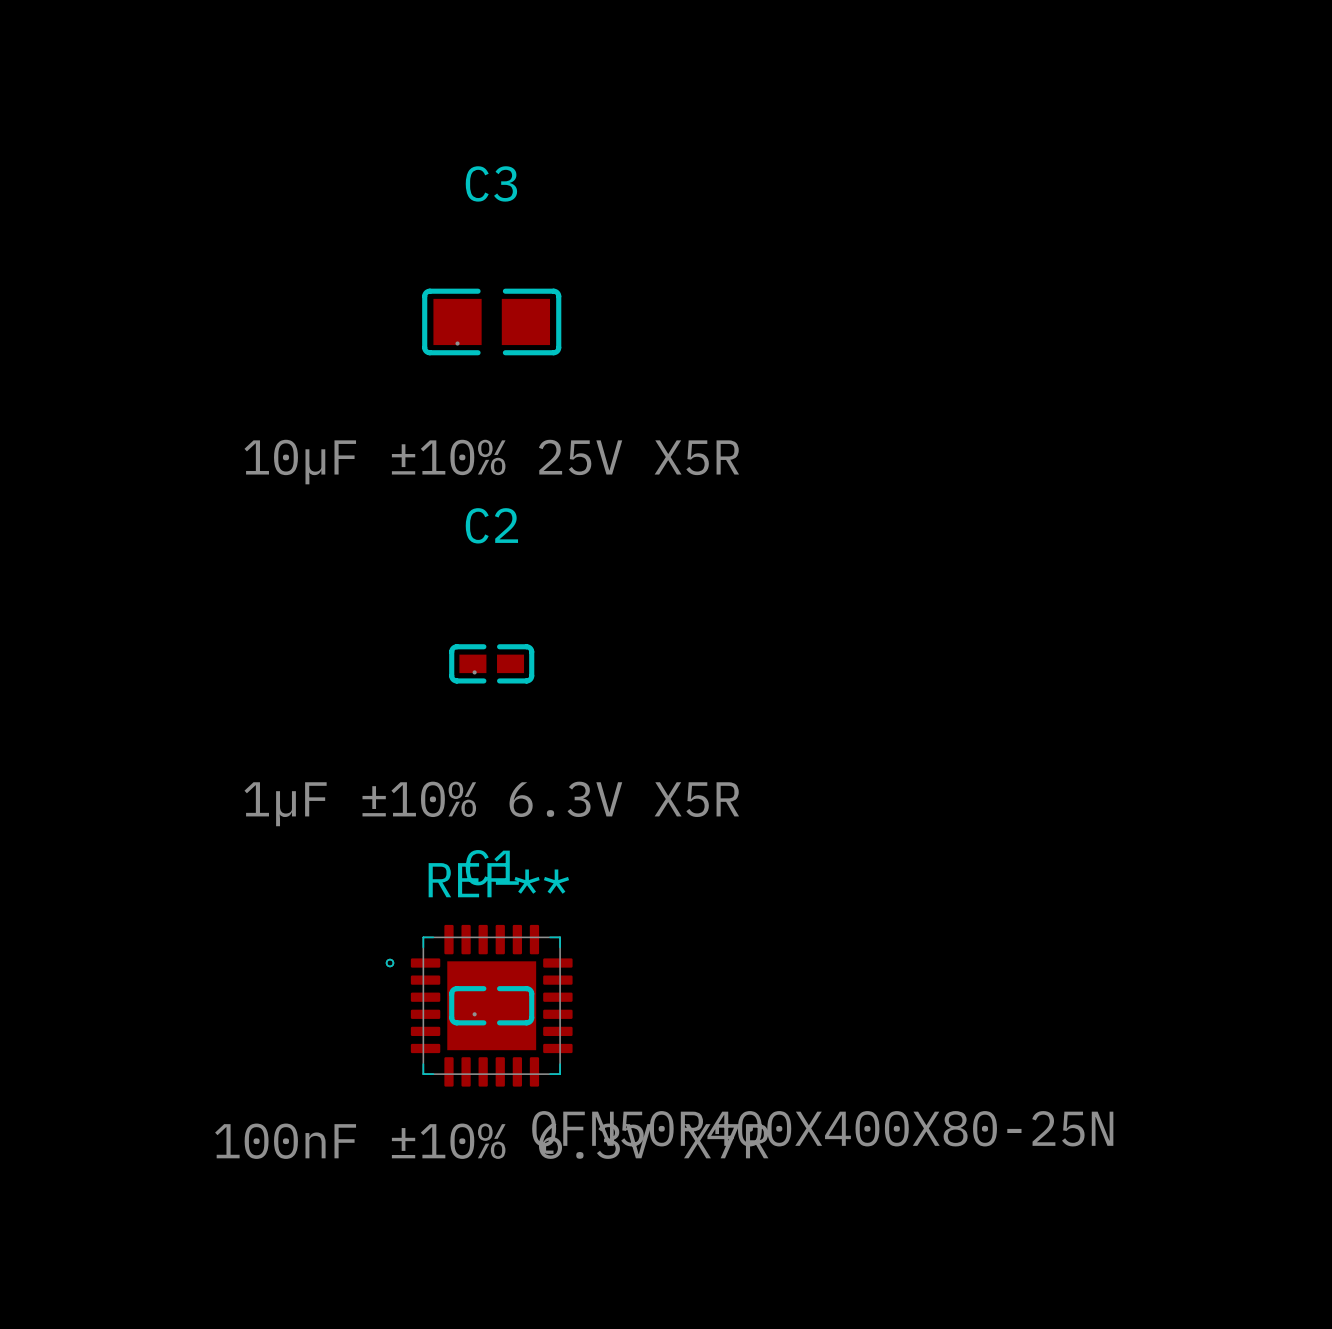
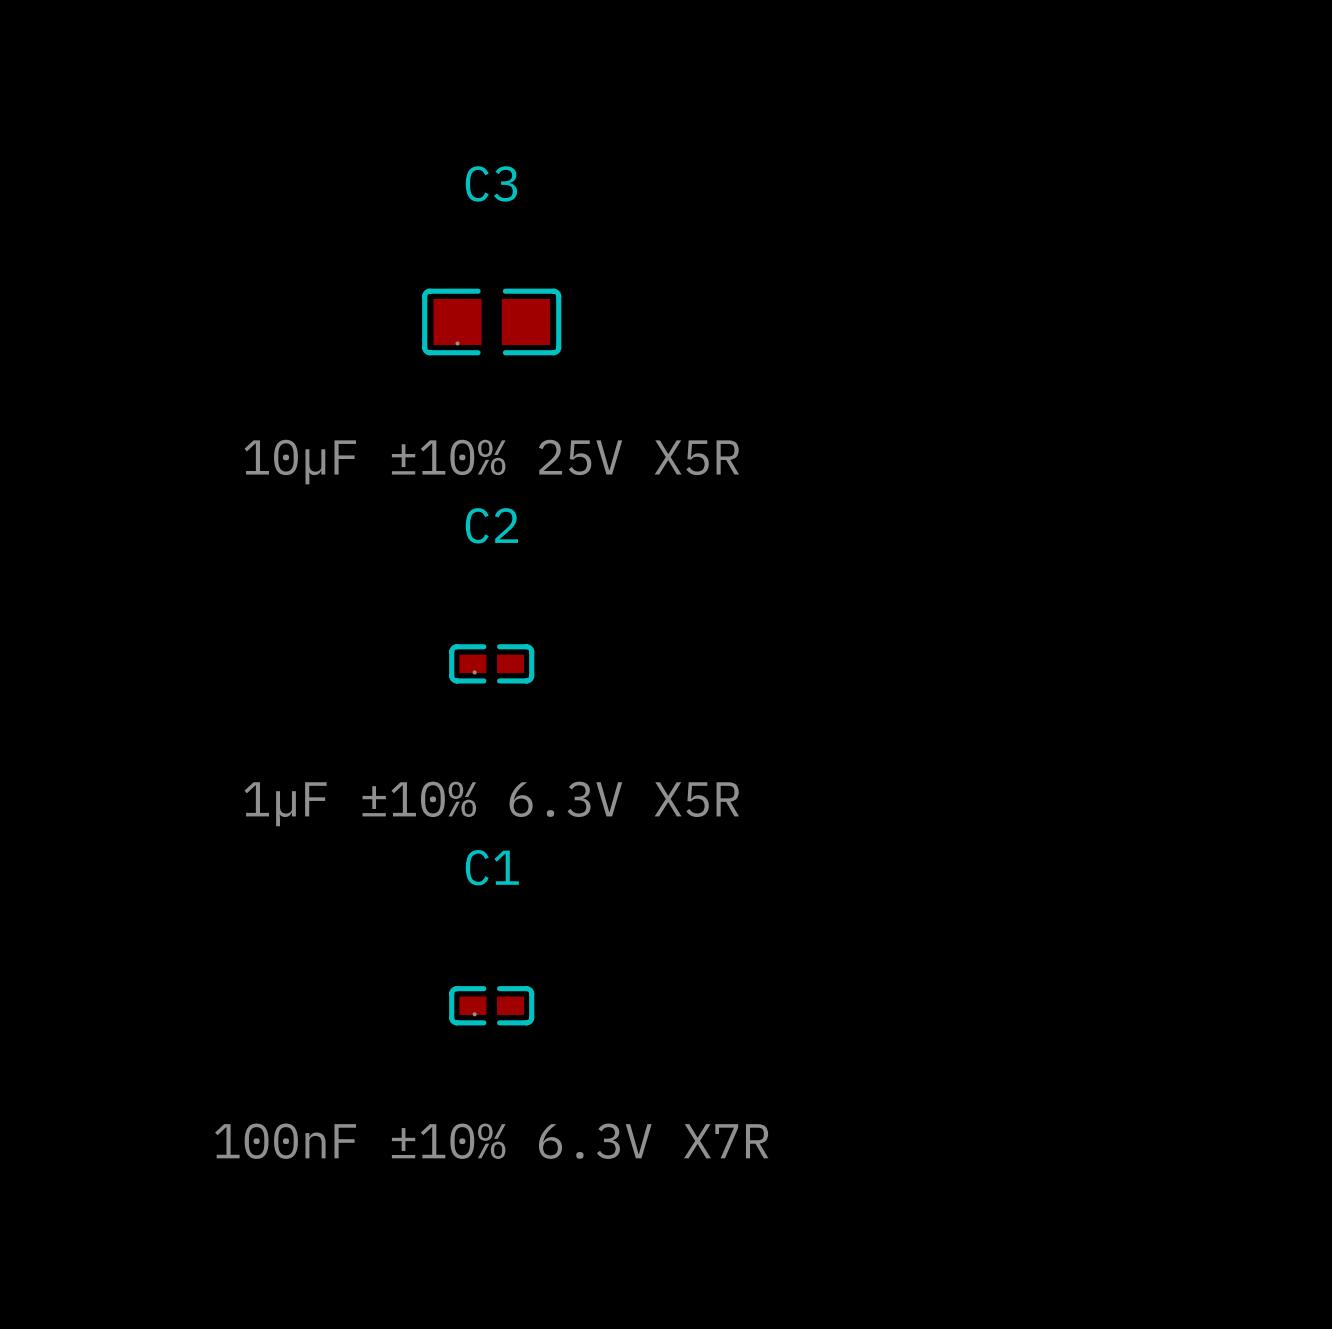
REF**: QFN50P400X400X80-25N (479, 1005) -> none

